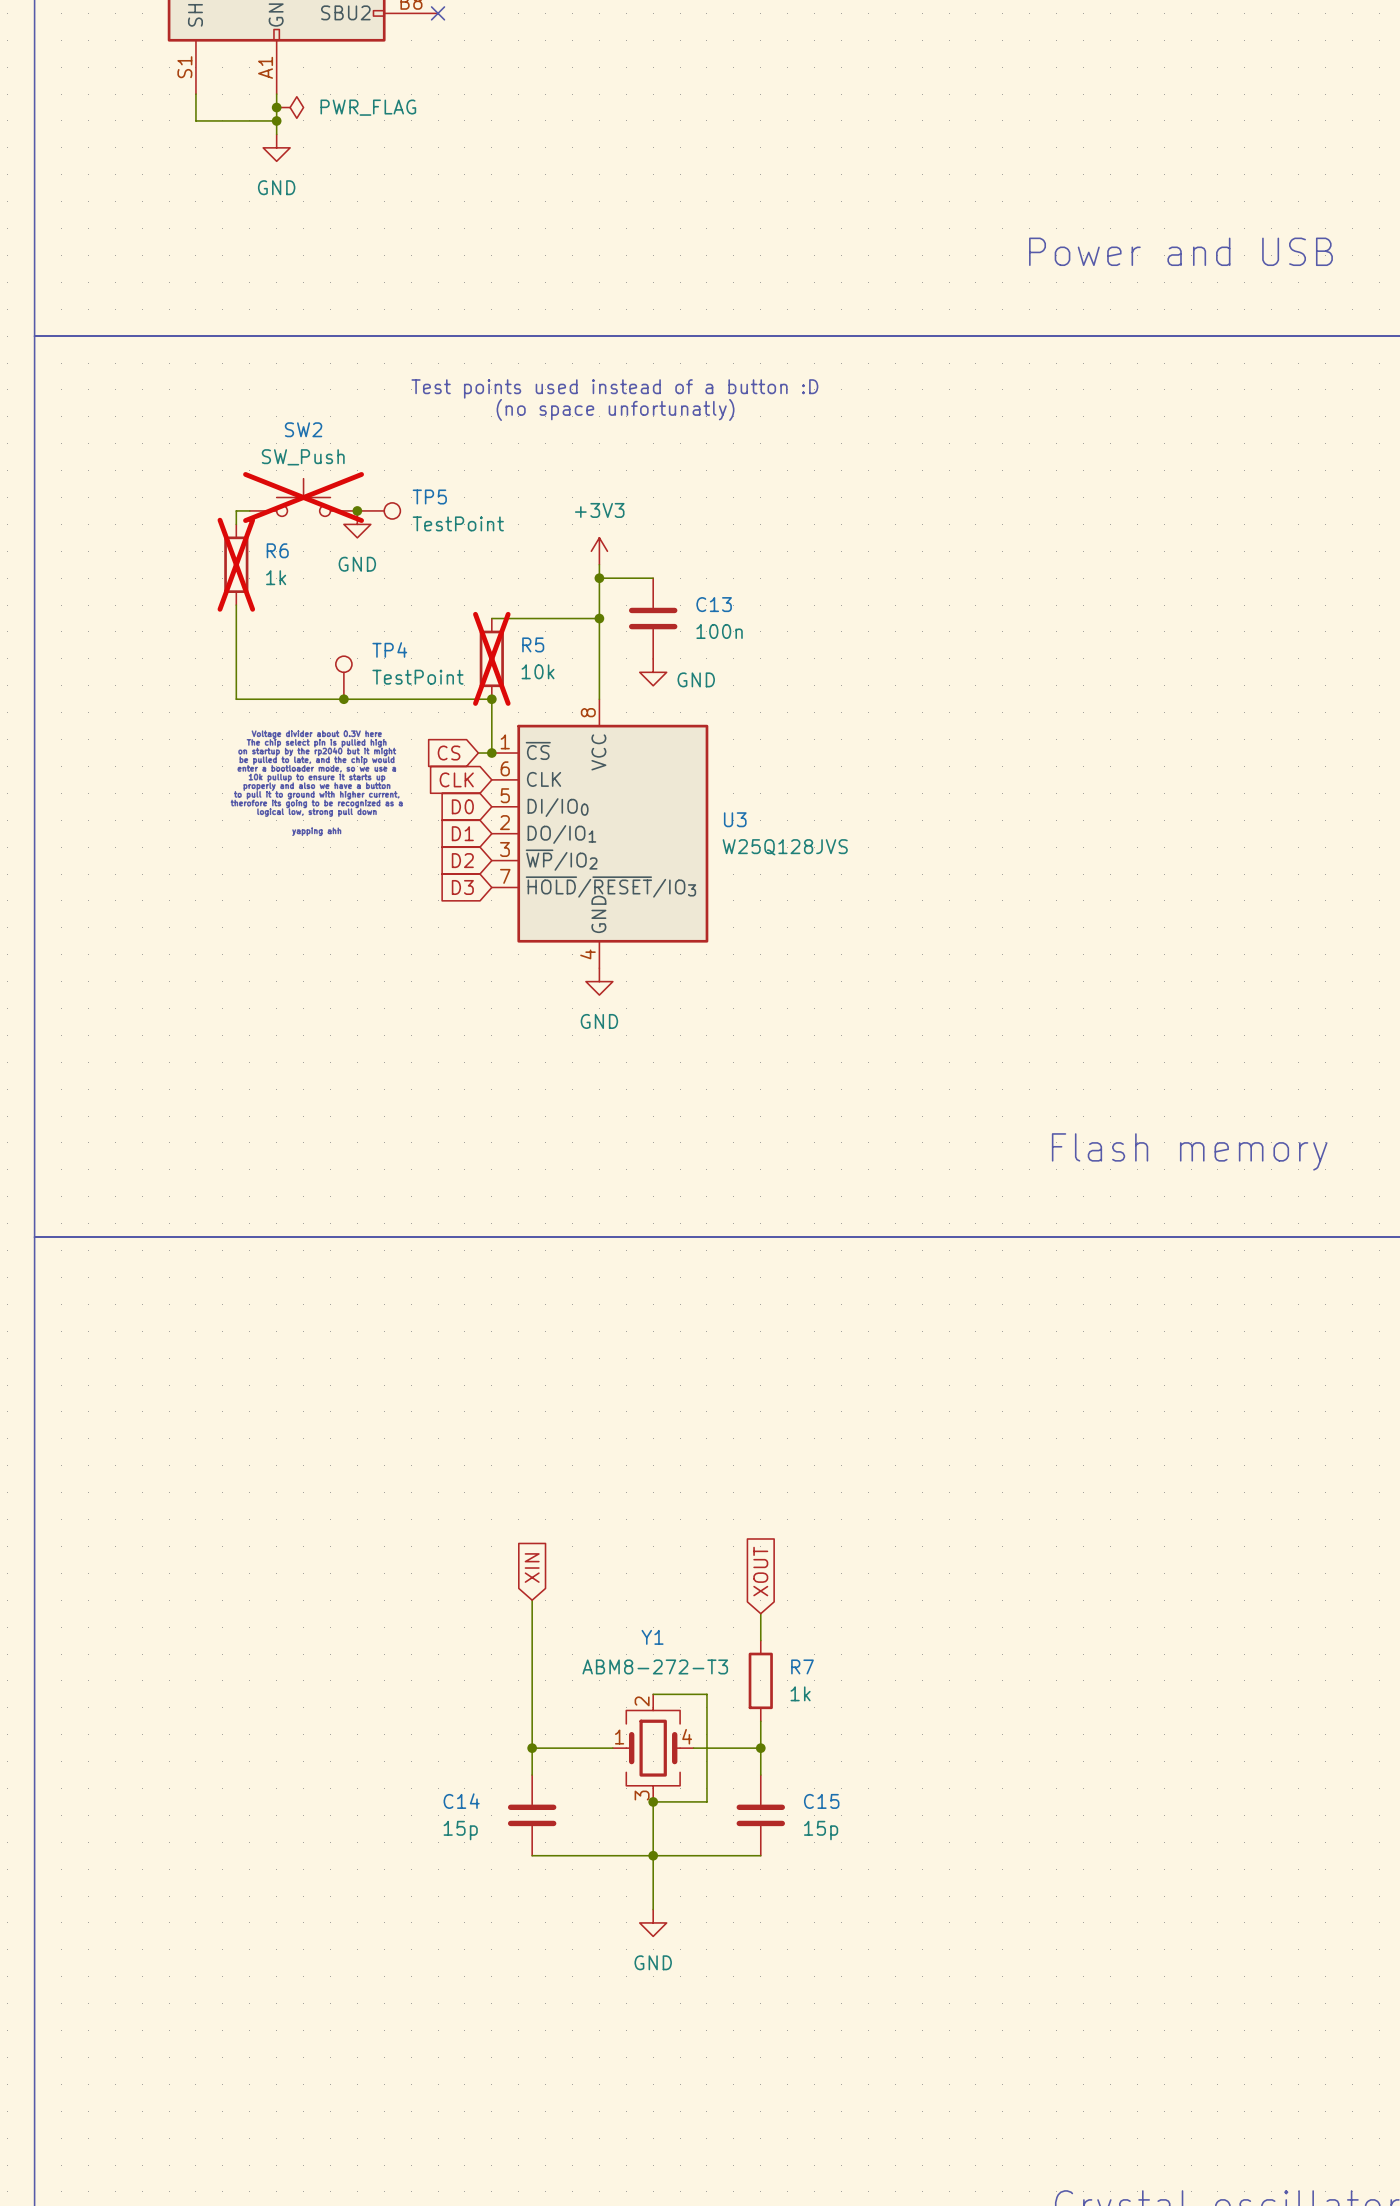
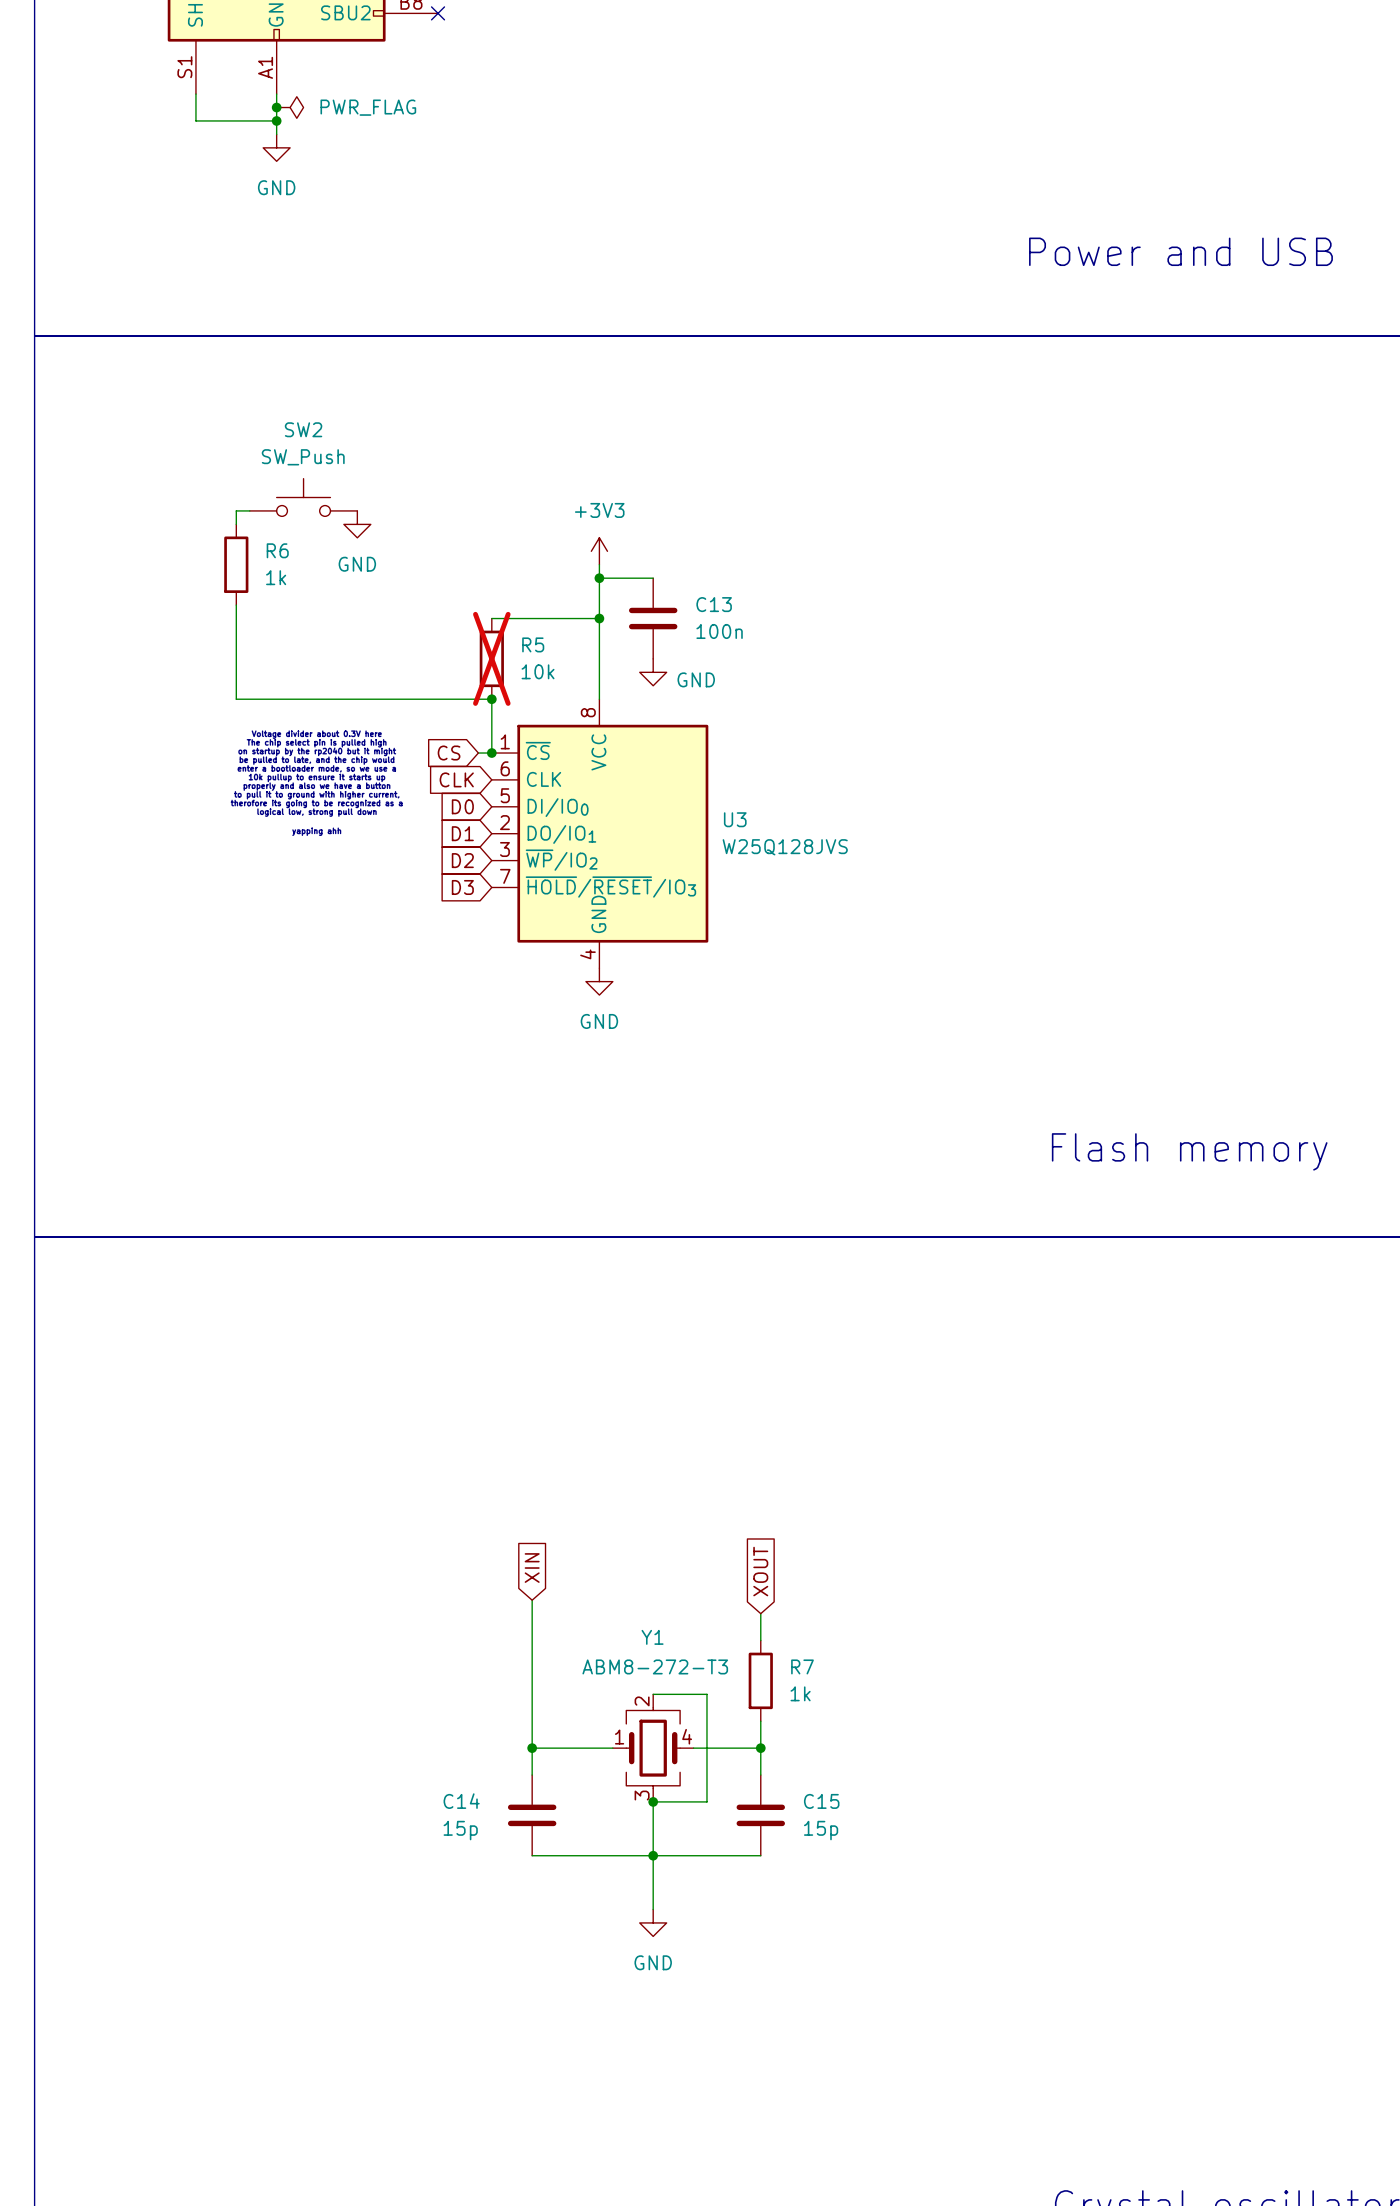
text: Test points used instead of a button :D (614, 388) -> none
text: (no space unfortunatly) (615, 409) -> none
SW2 do-not-place cross: (303, 497) -> none
junction: (357, 510) -> none
TP5: TestPoint (378, 510) -> none
R6 do-not-place cross: (236, 564) -> none
TP4: TestPoint (343, 677) -> none
junction: (343, 699) -> none

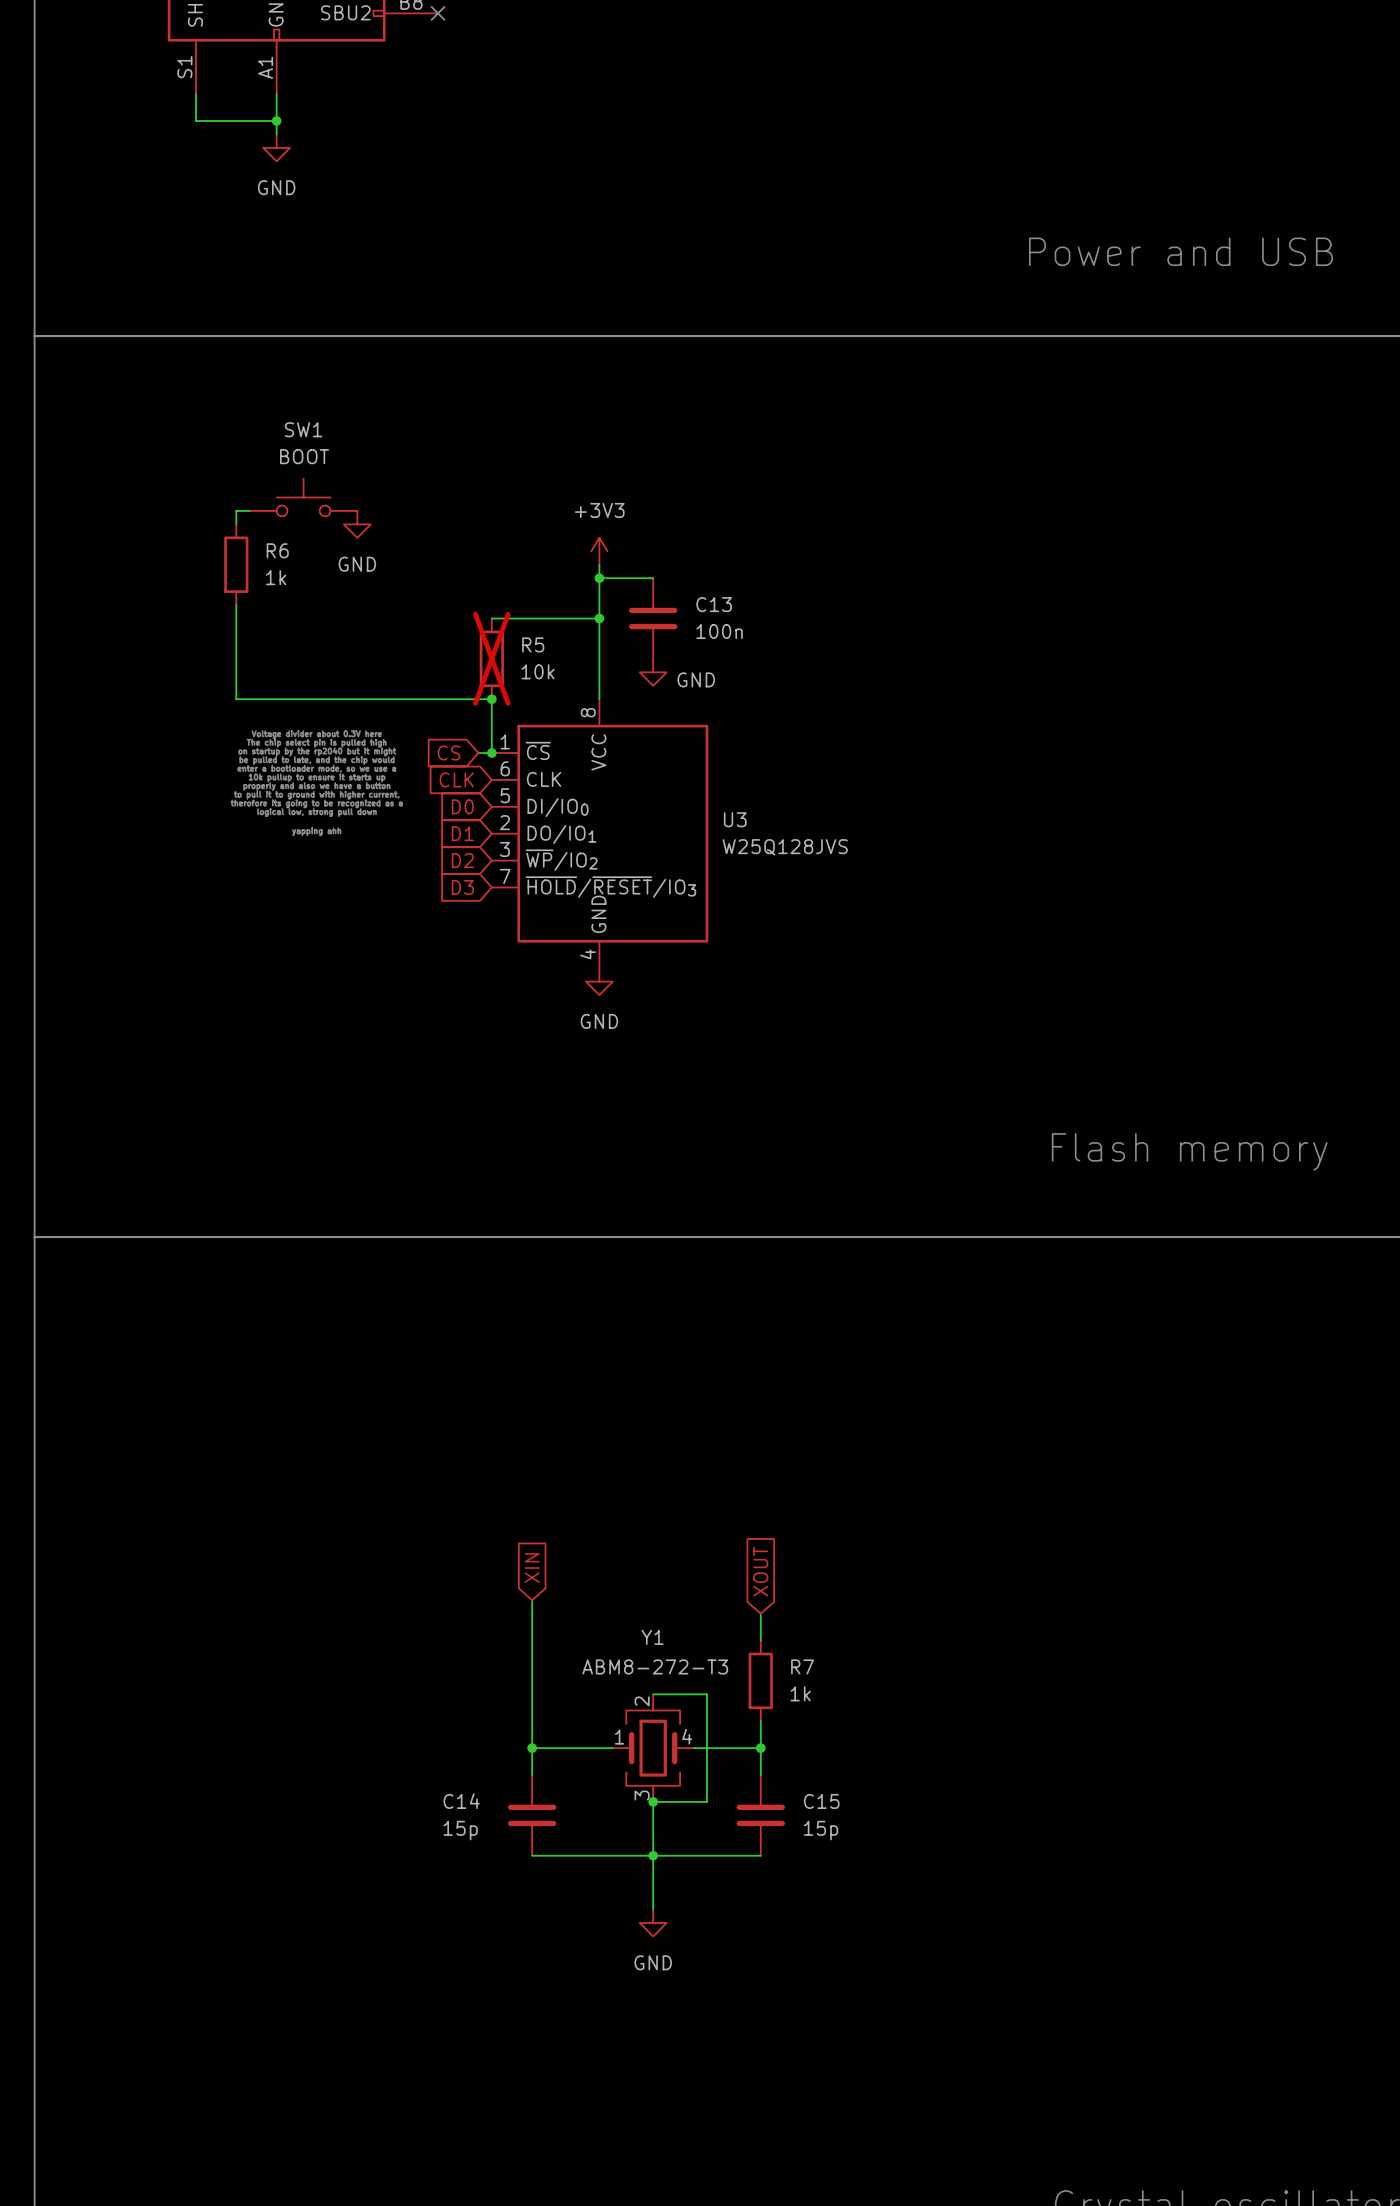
junction: (276, 107) -> none
power symbol: PWR_FLAG (290, 107) -> none
SW2 name: SW2 (303, 429) -> SW1 (303, 429)
SW2 value: SW_Push (303, 457) -> BOOT (304, 456)

